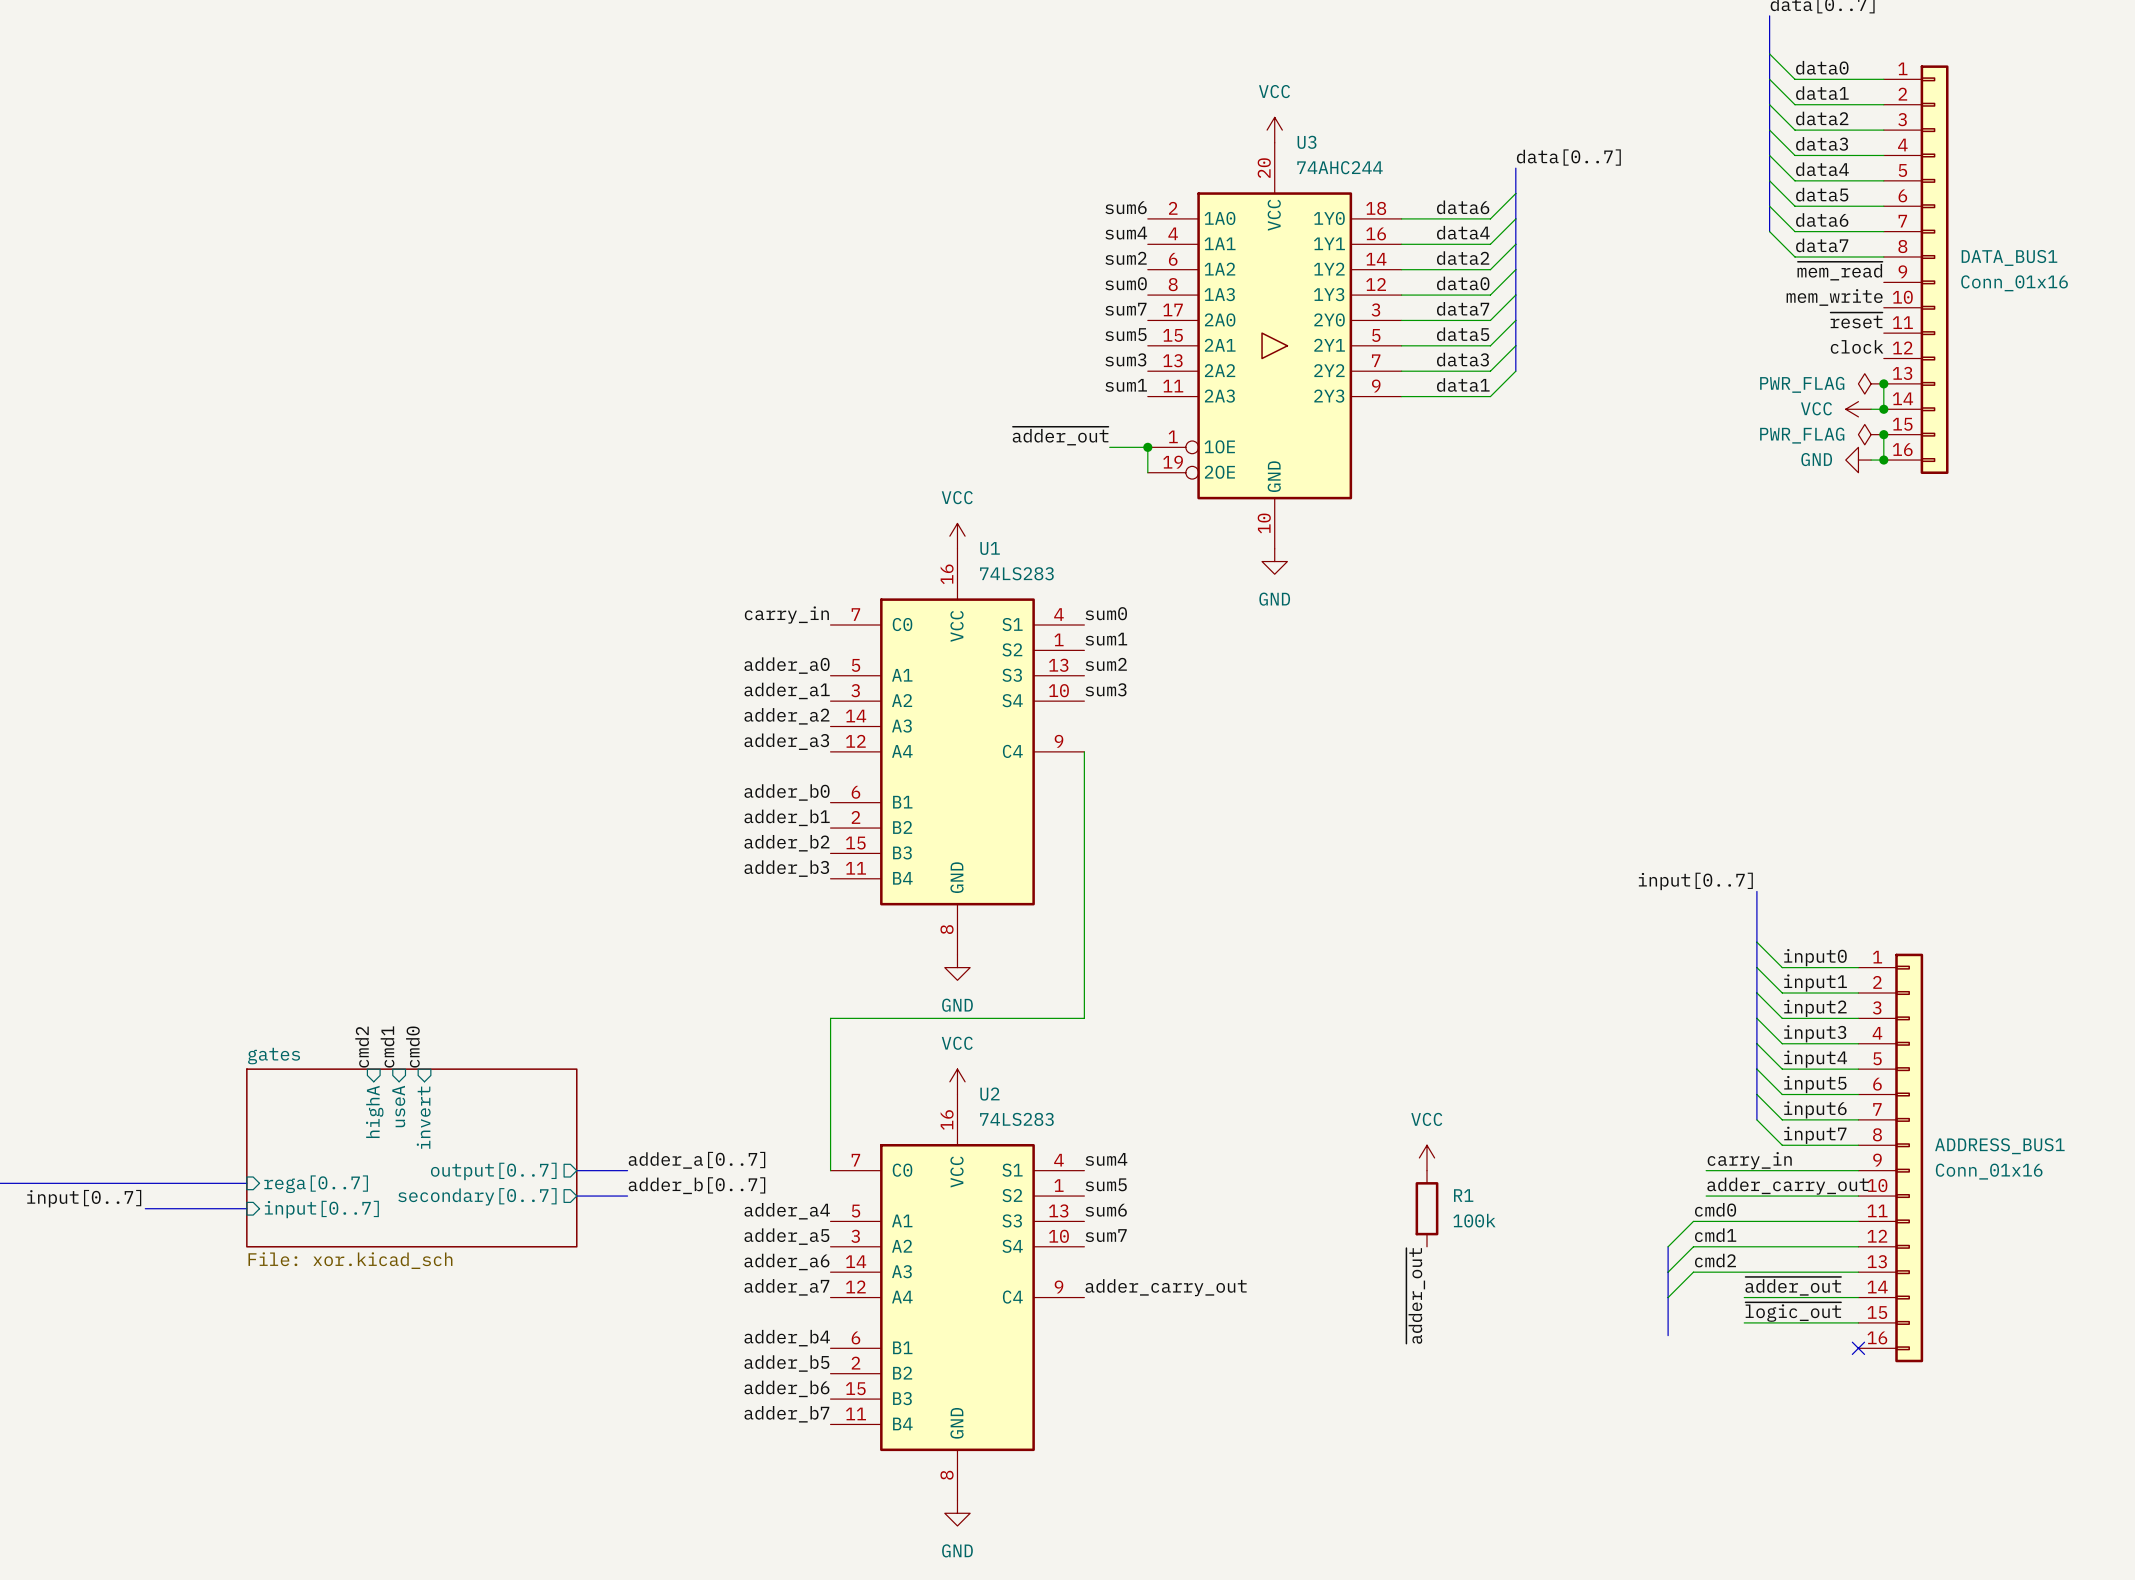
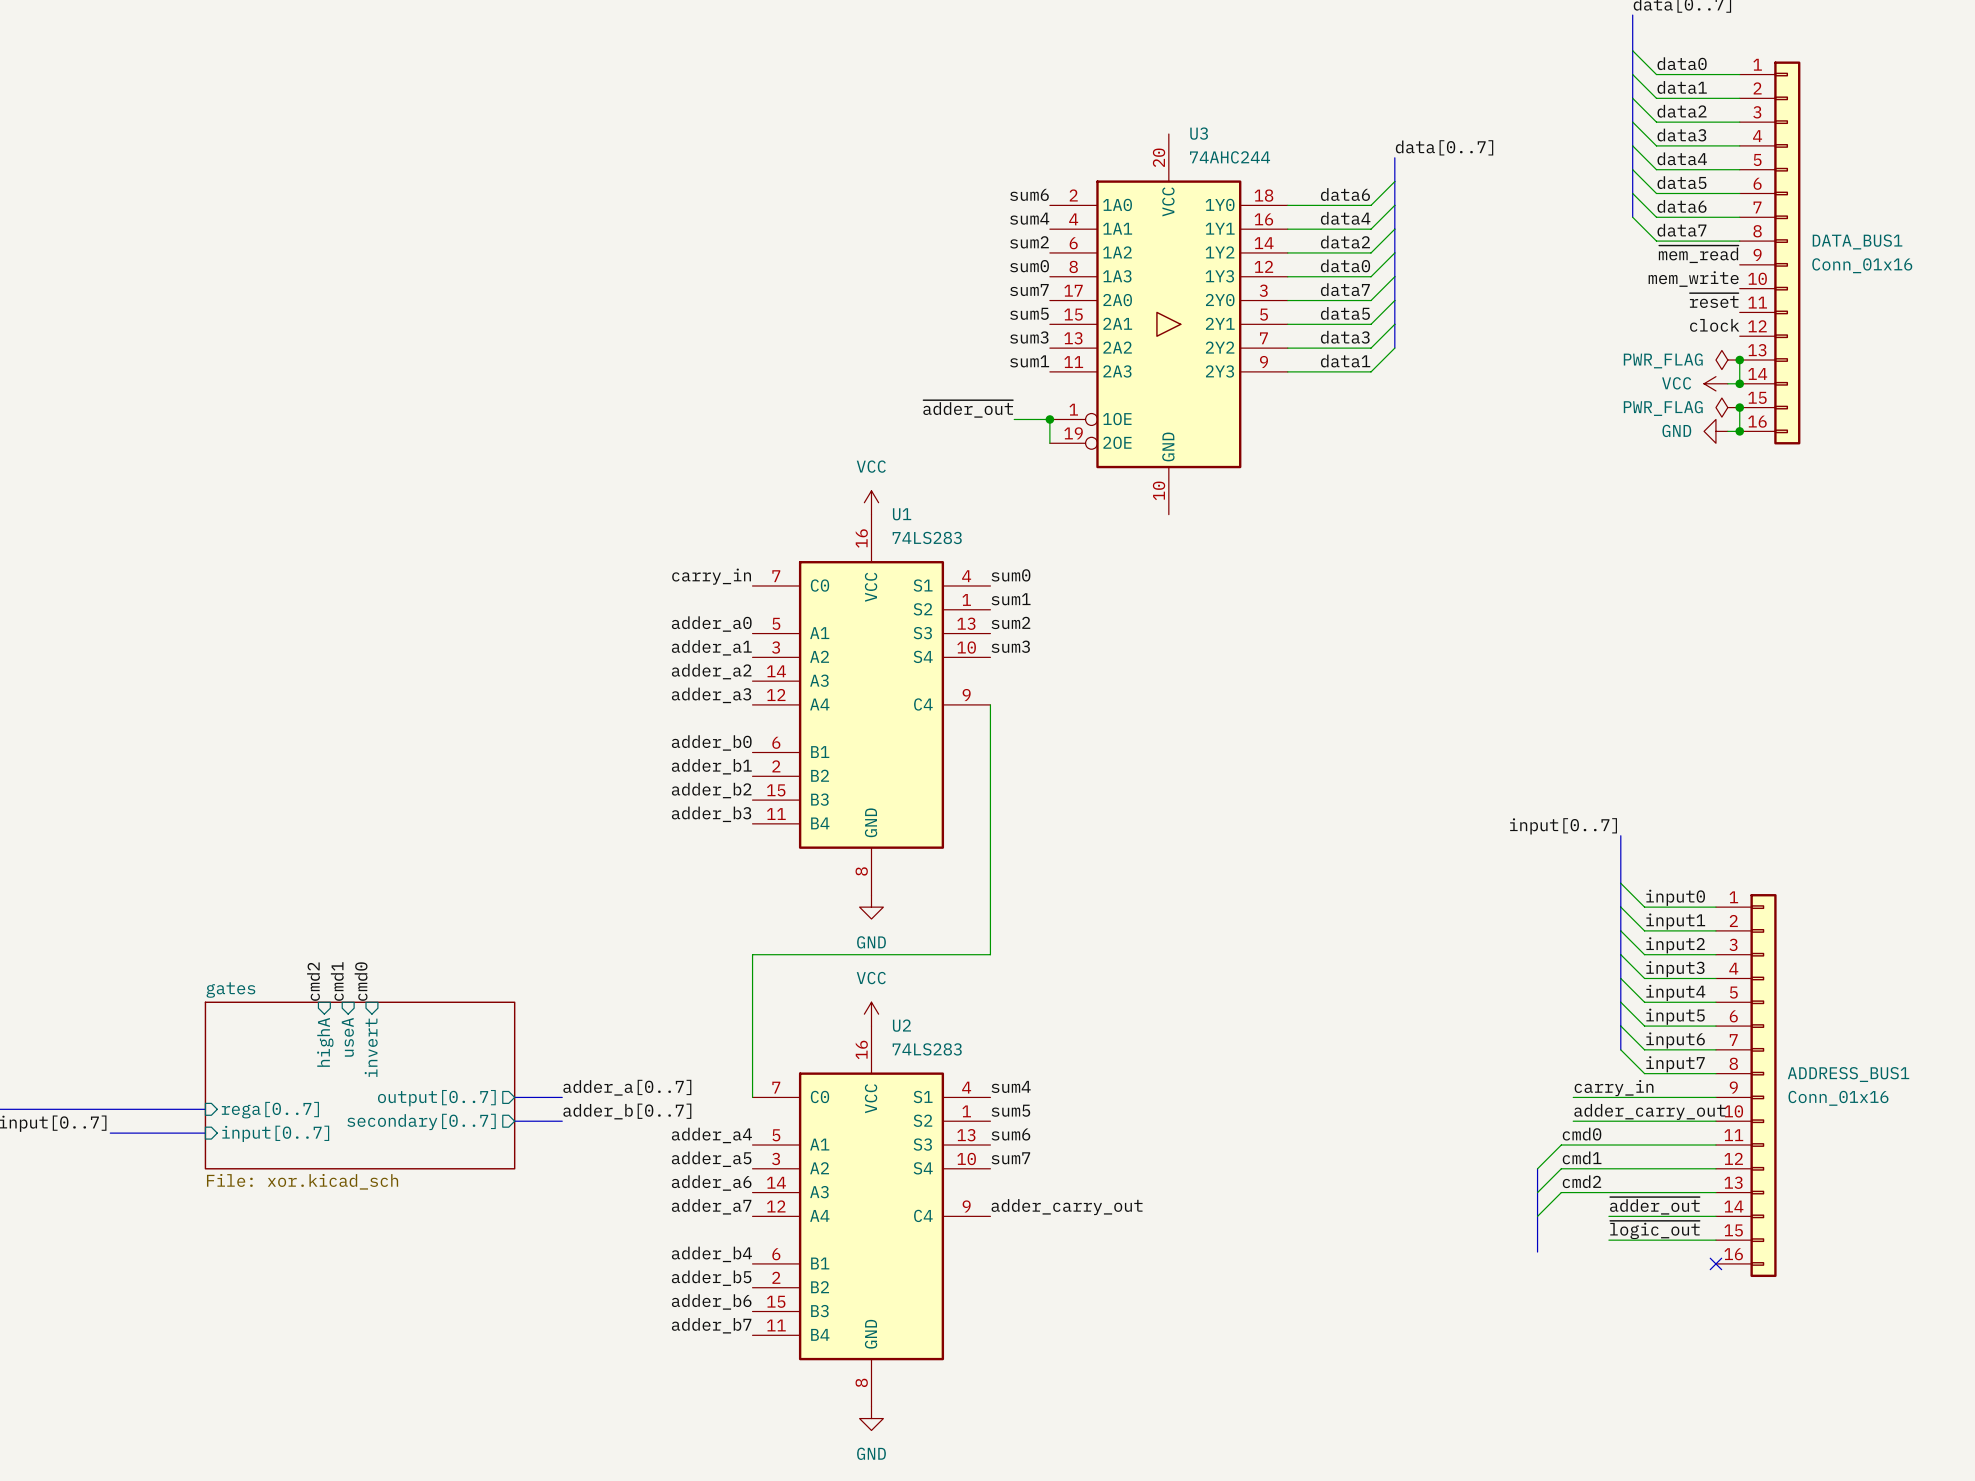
power symbol: VCC (1274, 130) -> none
power symbol: GND (1274, 561) -> none
power symbol: VCC (1426, 1157) -> none
R1: 100k (1426, 1208) -> none
label: ~{adder_out} (1415, 1295) -> none

